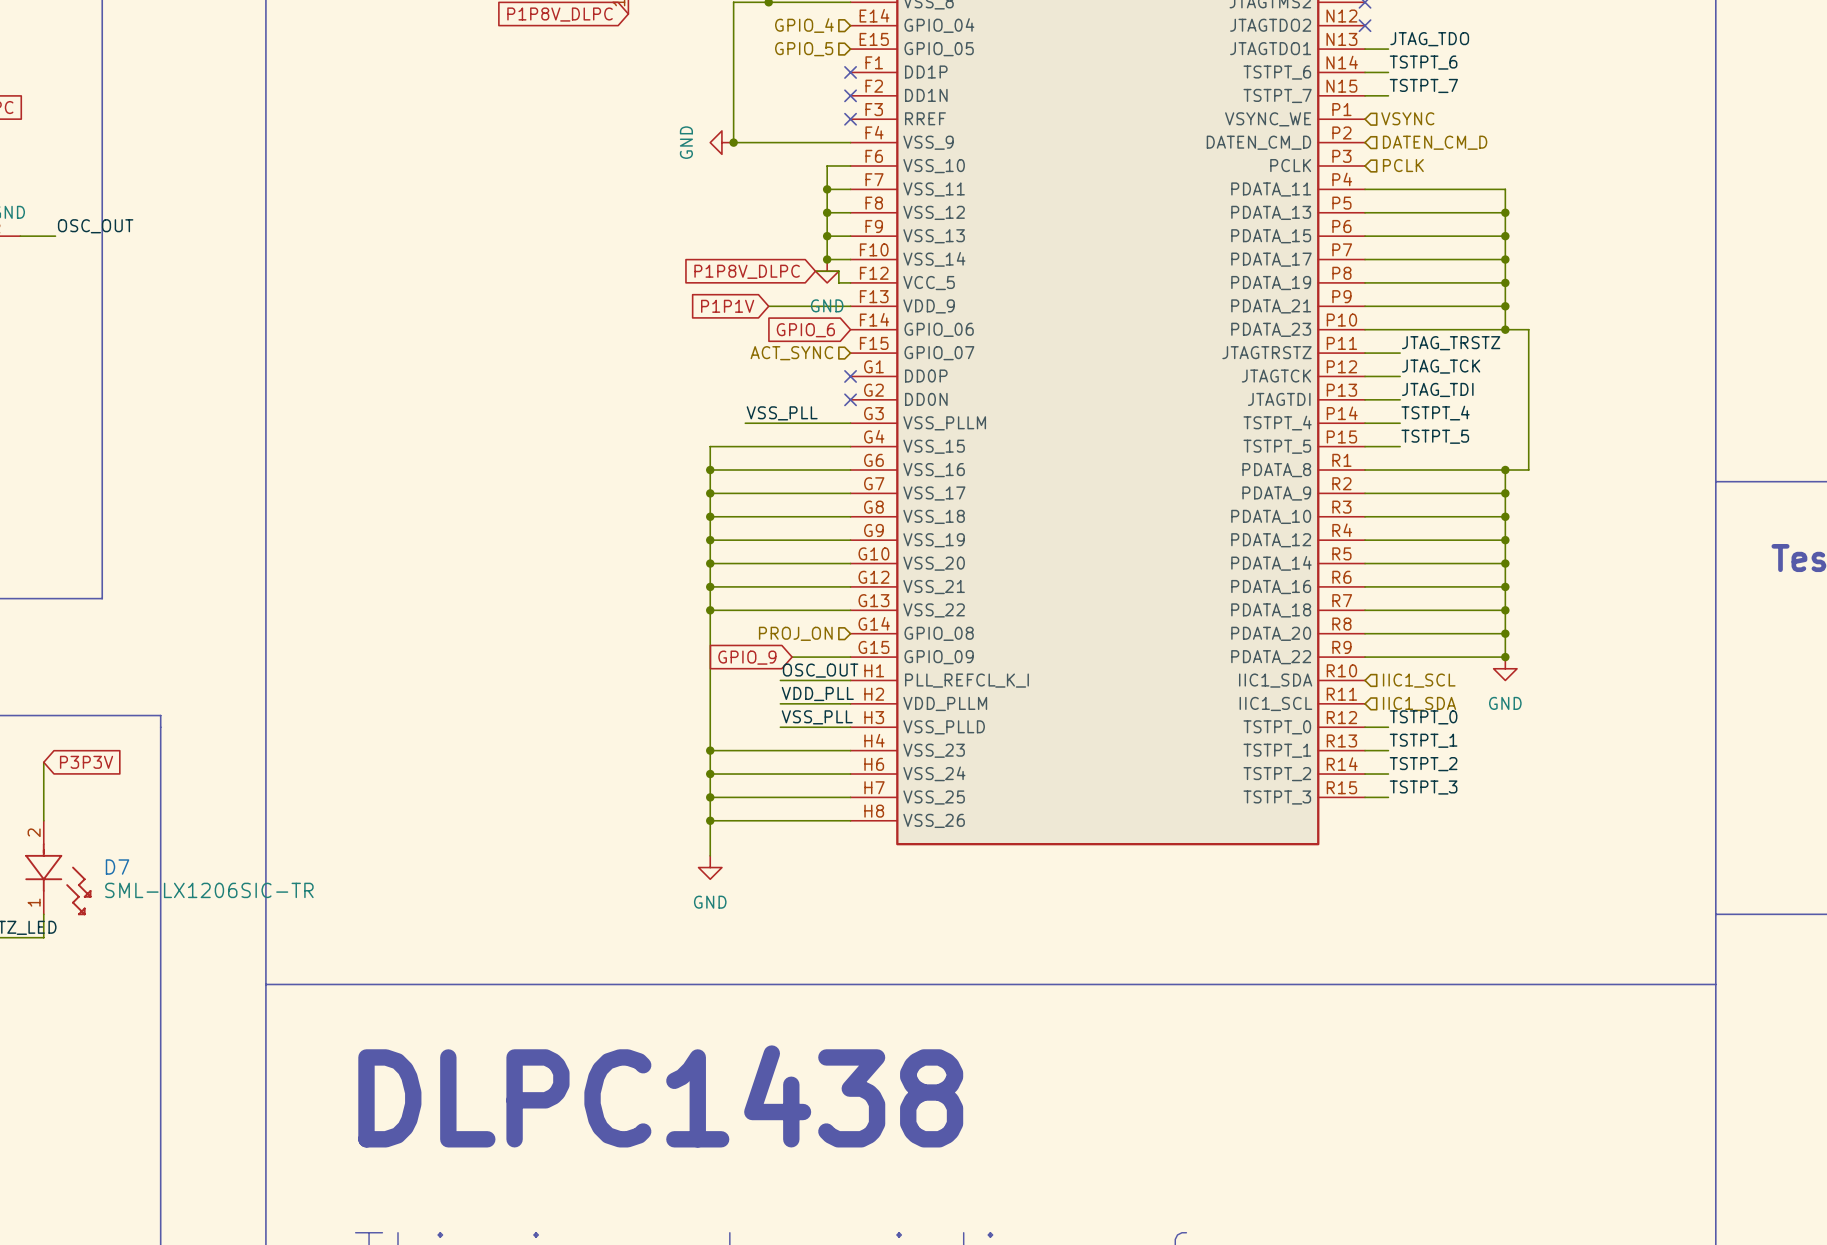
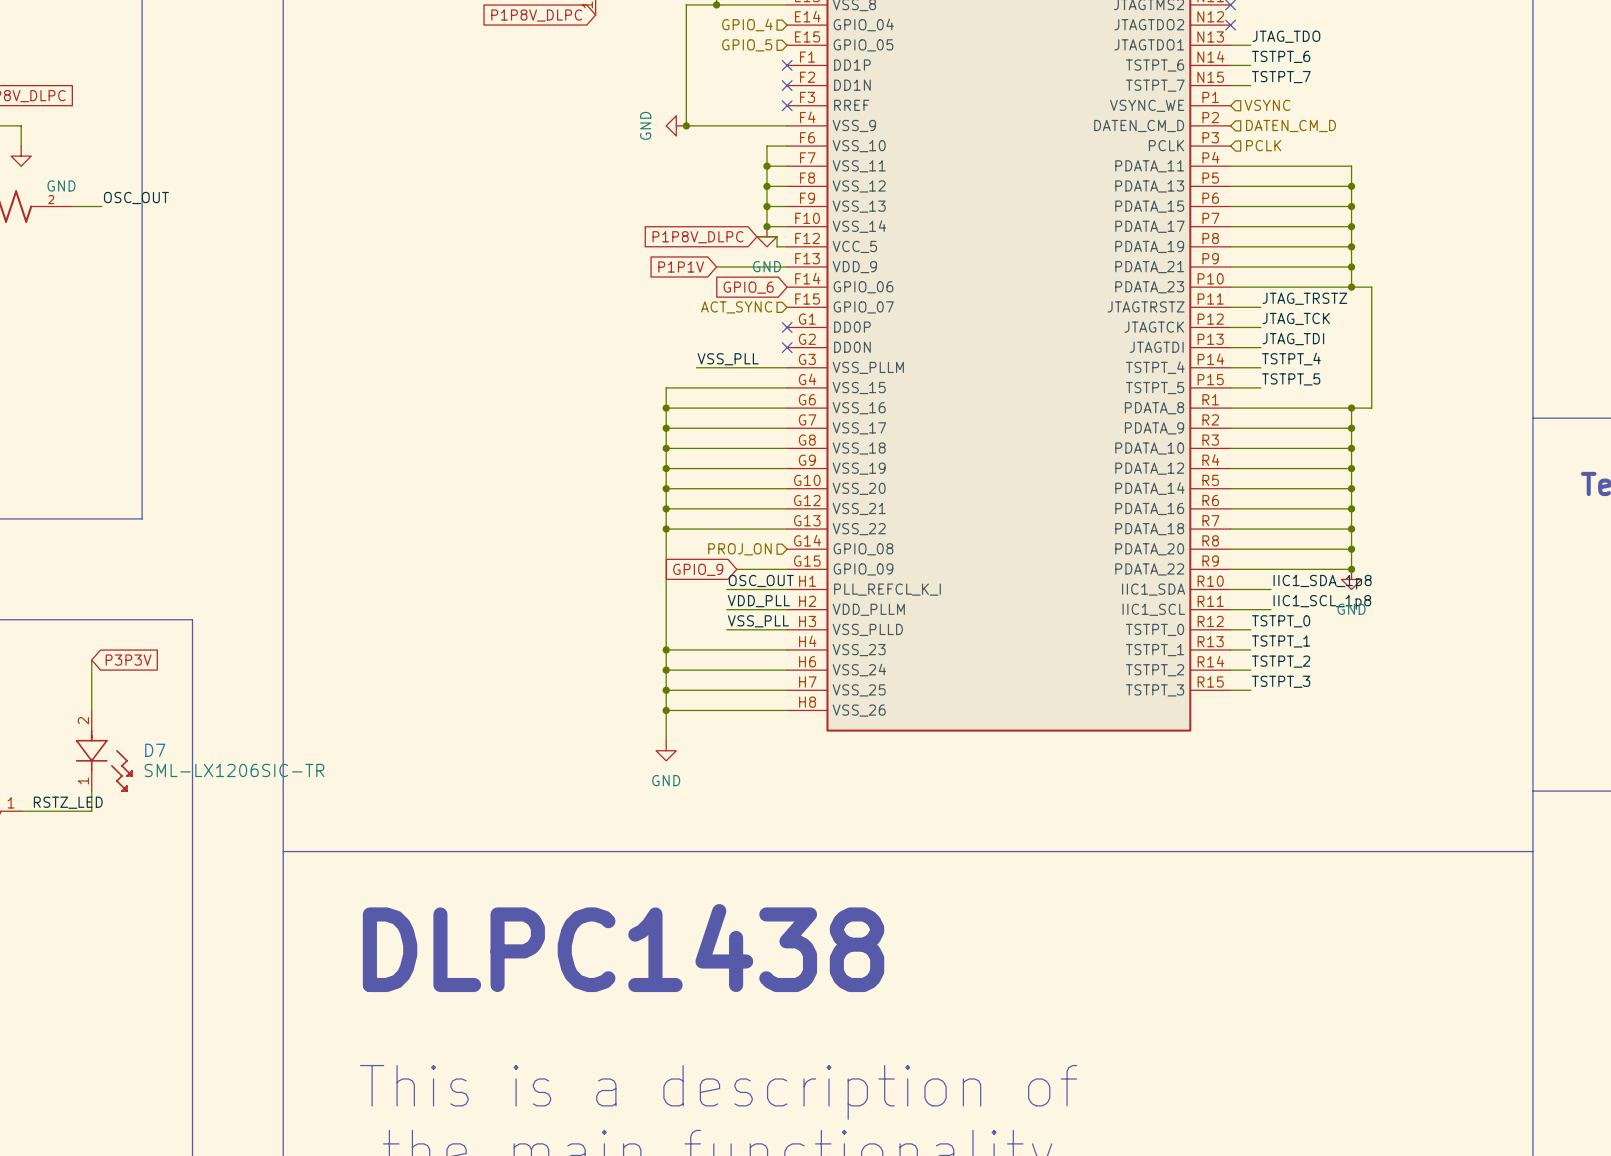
label: none -> IIC1_SDA_1p8 (1322, 582)
wire: none -> (1230, 589) (1270, 589)
hierarchical label: IIC1_SCL (1419, 680) -> none
label: none -> IIC1_SCL_1p8 (1322, 602)
wire: none -> (1230, 609) (1270, 609)
hierarchical label: IIC1_SDA (1419, 703) -> none

